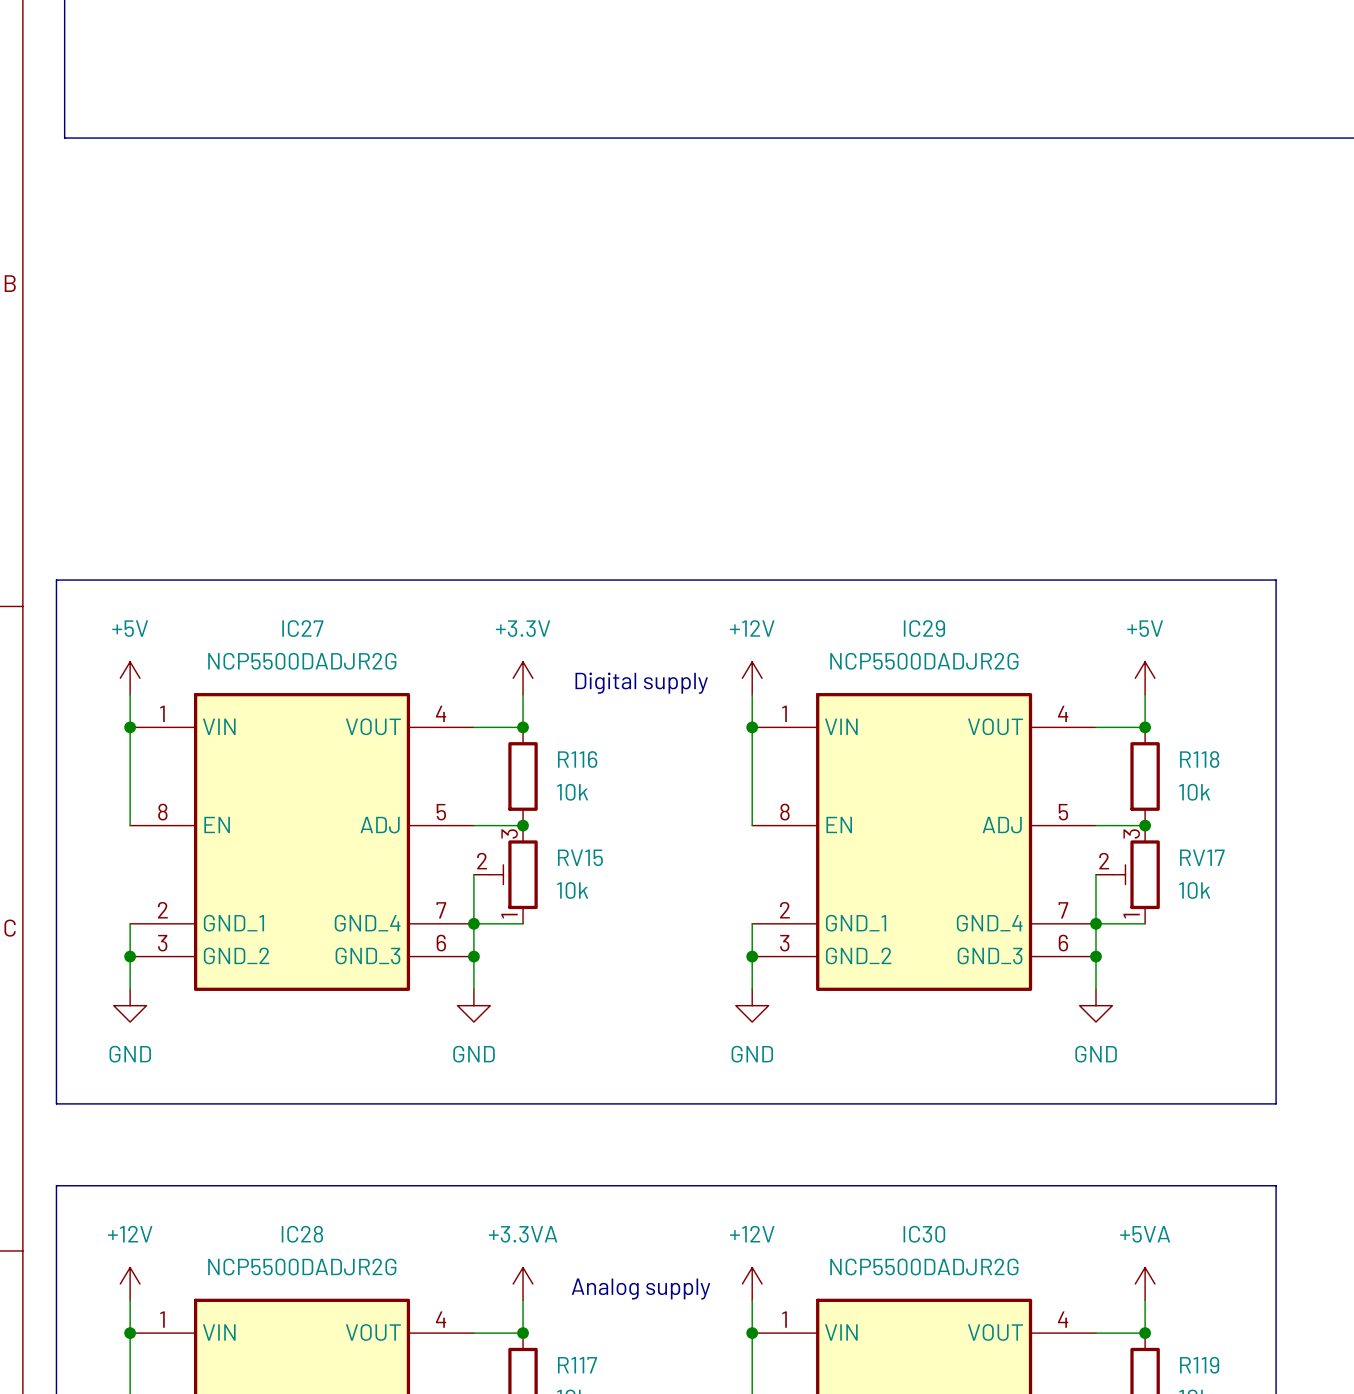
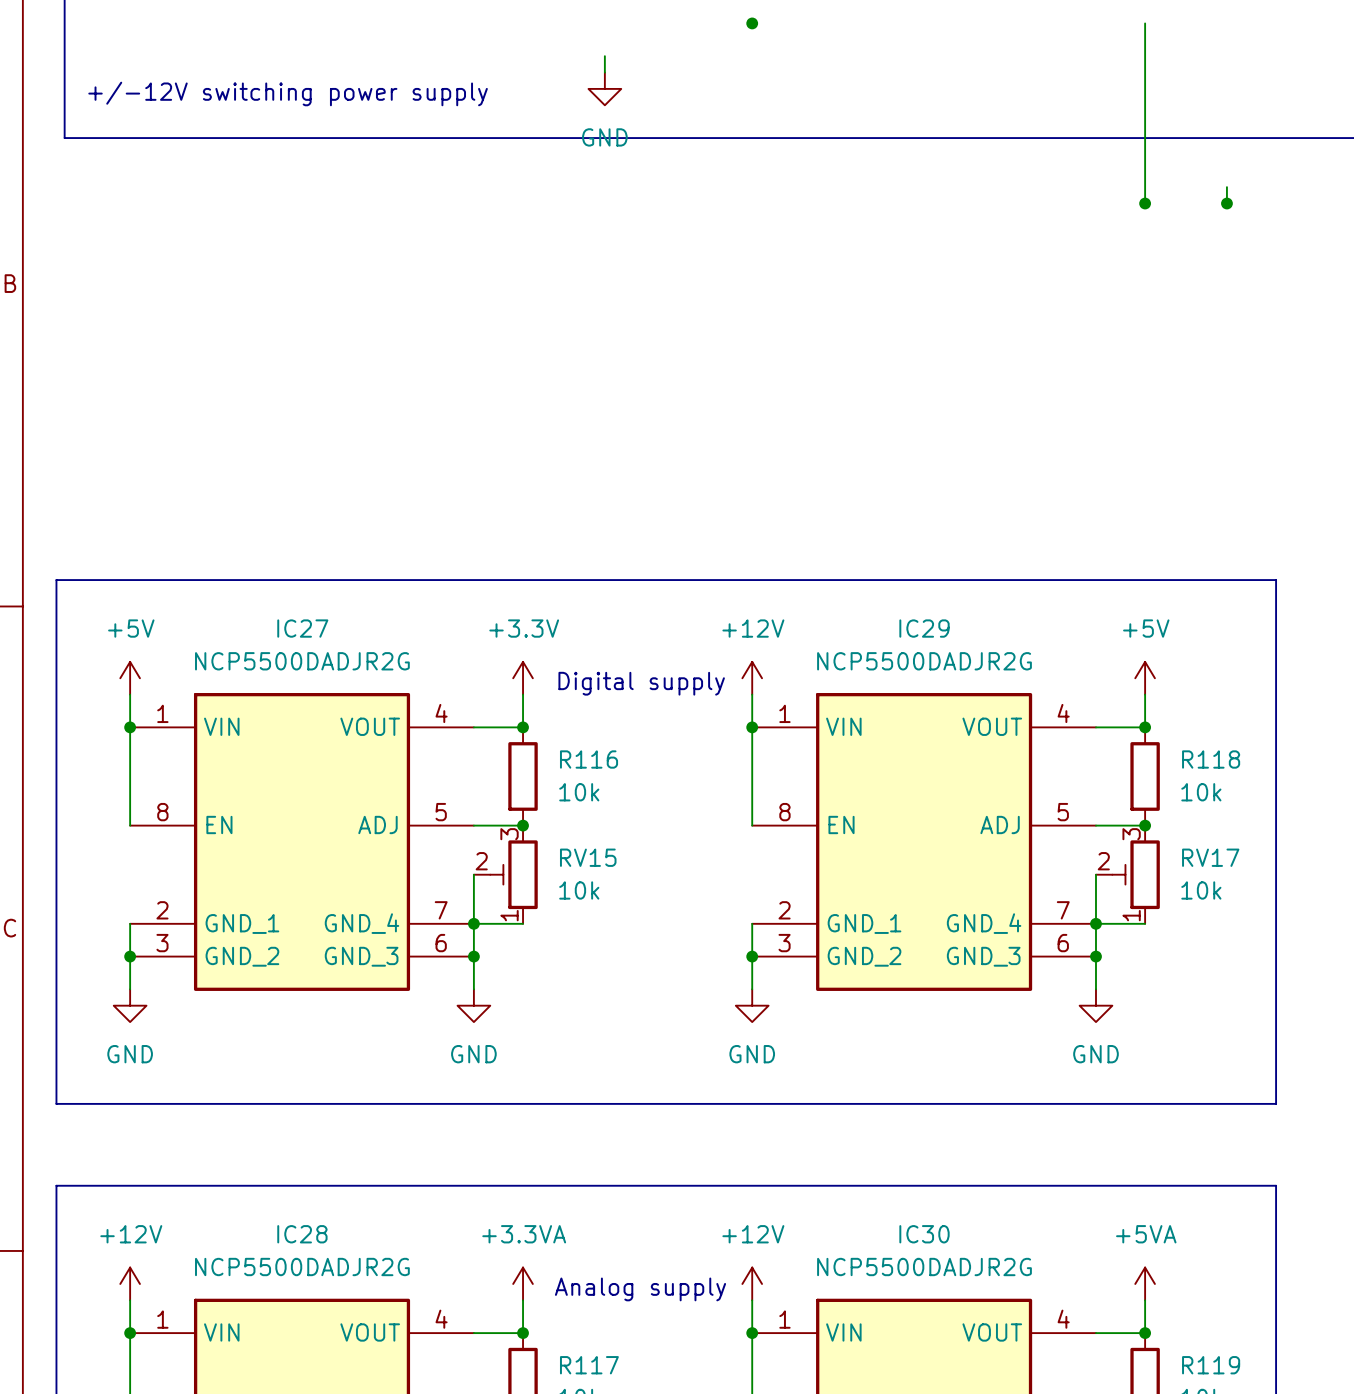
junction: none -> (752, 23)
wire: none -> (1145, 23) (1145, 203)
wire: none -> (604, 56) (604, 72)
power symbol: none -> GND (604, 88)
text: none -> +/-12V switching power supply (288, 93)
wire: none -> (1226, 187) (1226, 203)
junction: none -> (1145, 203)
junction: none -> (1226, 203)

